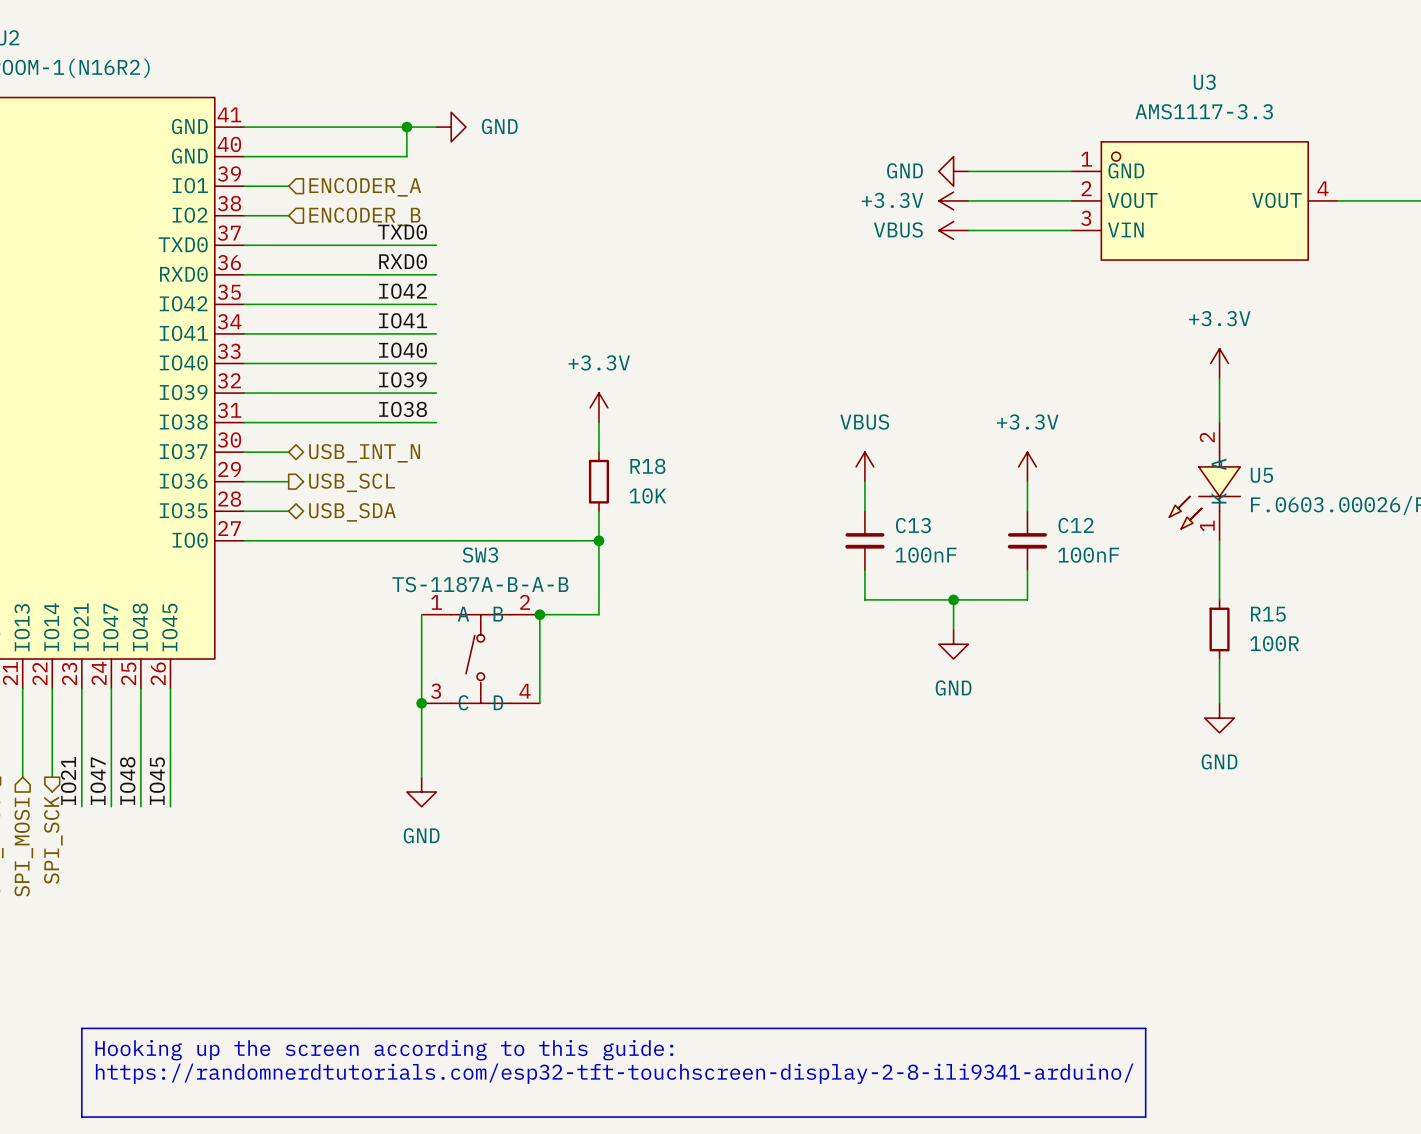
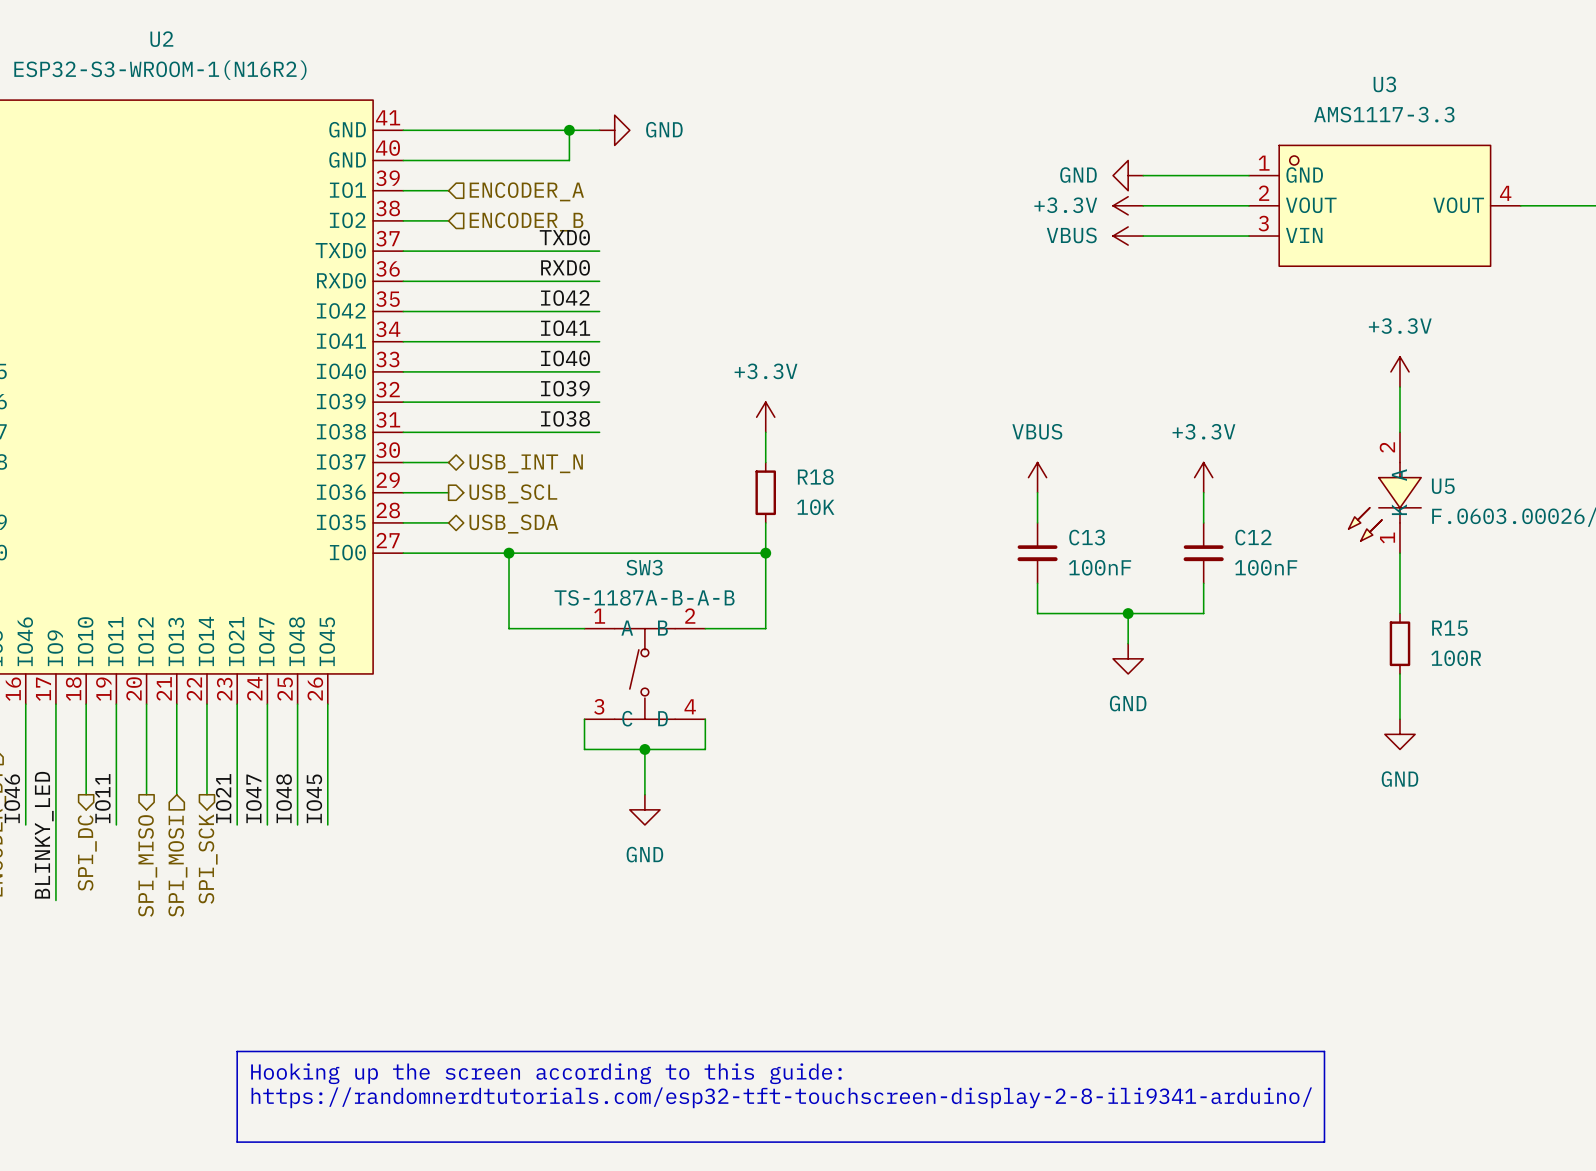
junction: none -> (509, 553)
wire: (421, 614) (421, 703) -> (584, 628) (509, 628) (509, 553)
wire: (539, 614) (539, 703) -> none
junction: (539, 614) -> none
junction: (421, 703) -> none
wire: (421, 732) (421, 777) -> (584, 749) (705, 749) (705, 719)
wire: none -> (644, 749) (644, 794)
junction: none -> (644, 749)
power symbol position: GND (421, 791) -> GND (644, 809)

